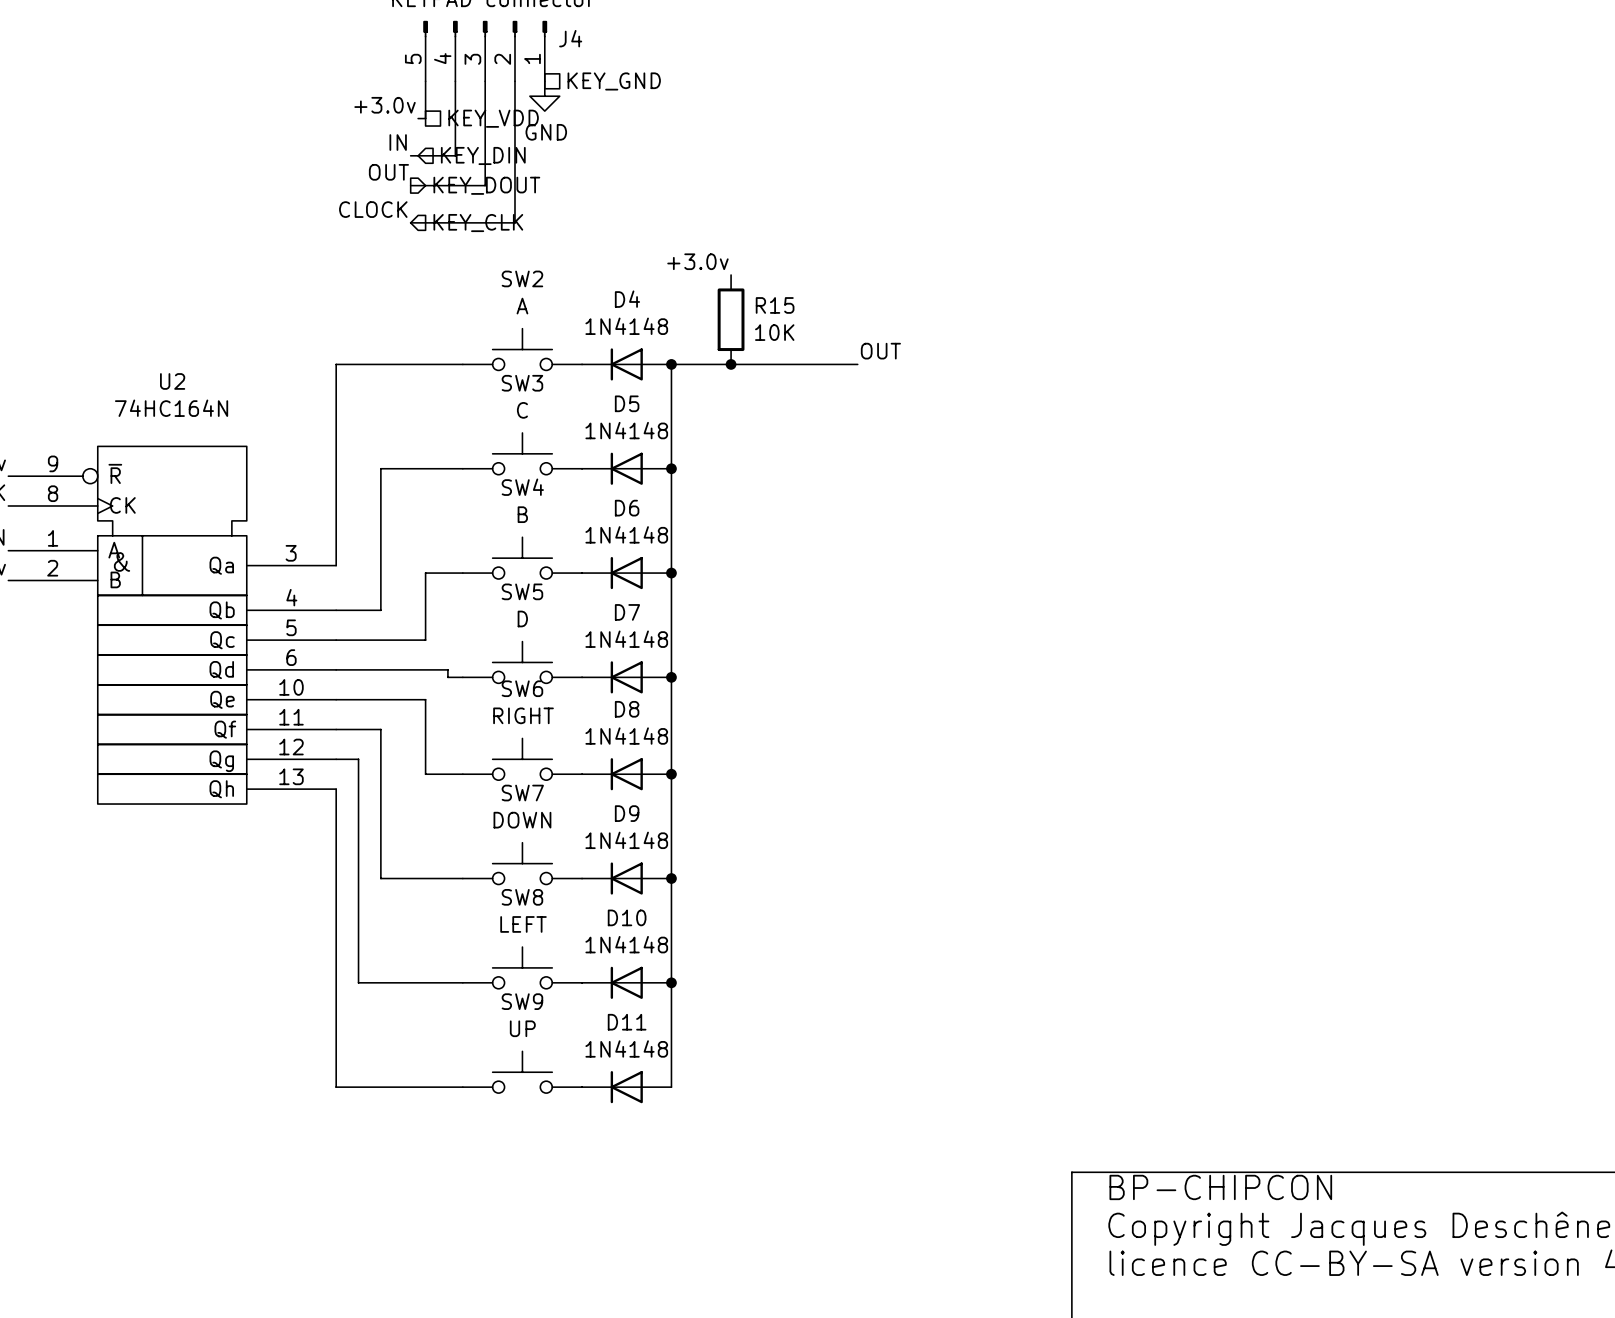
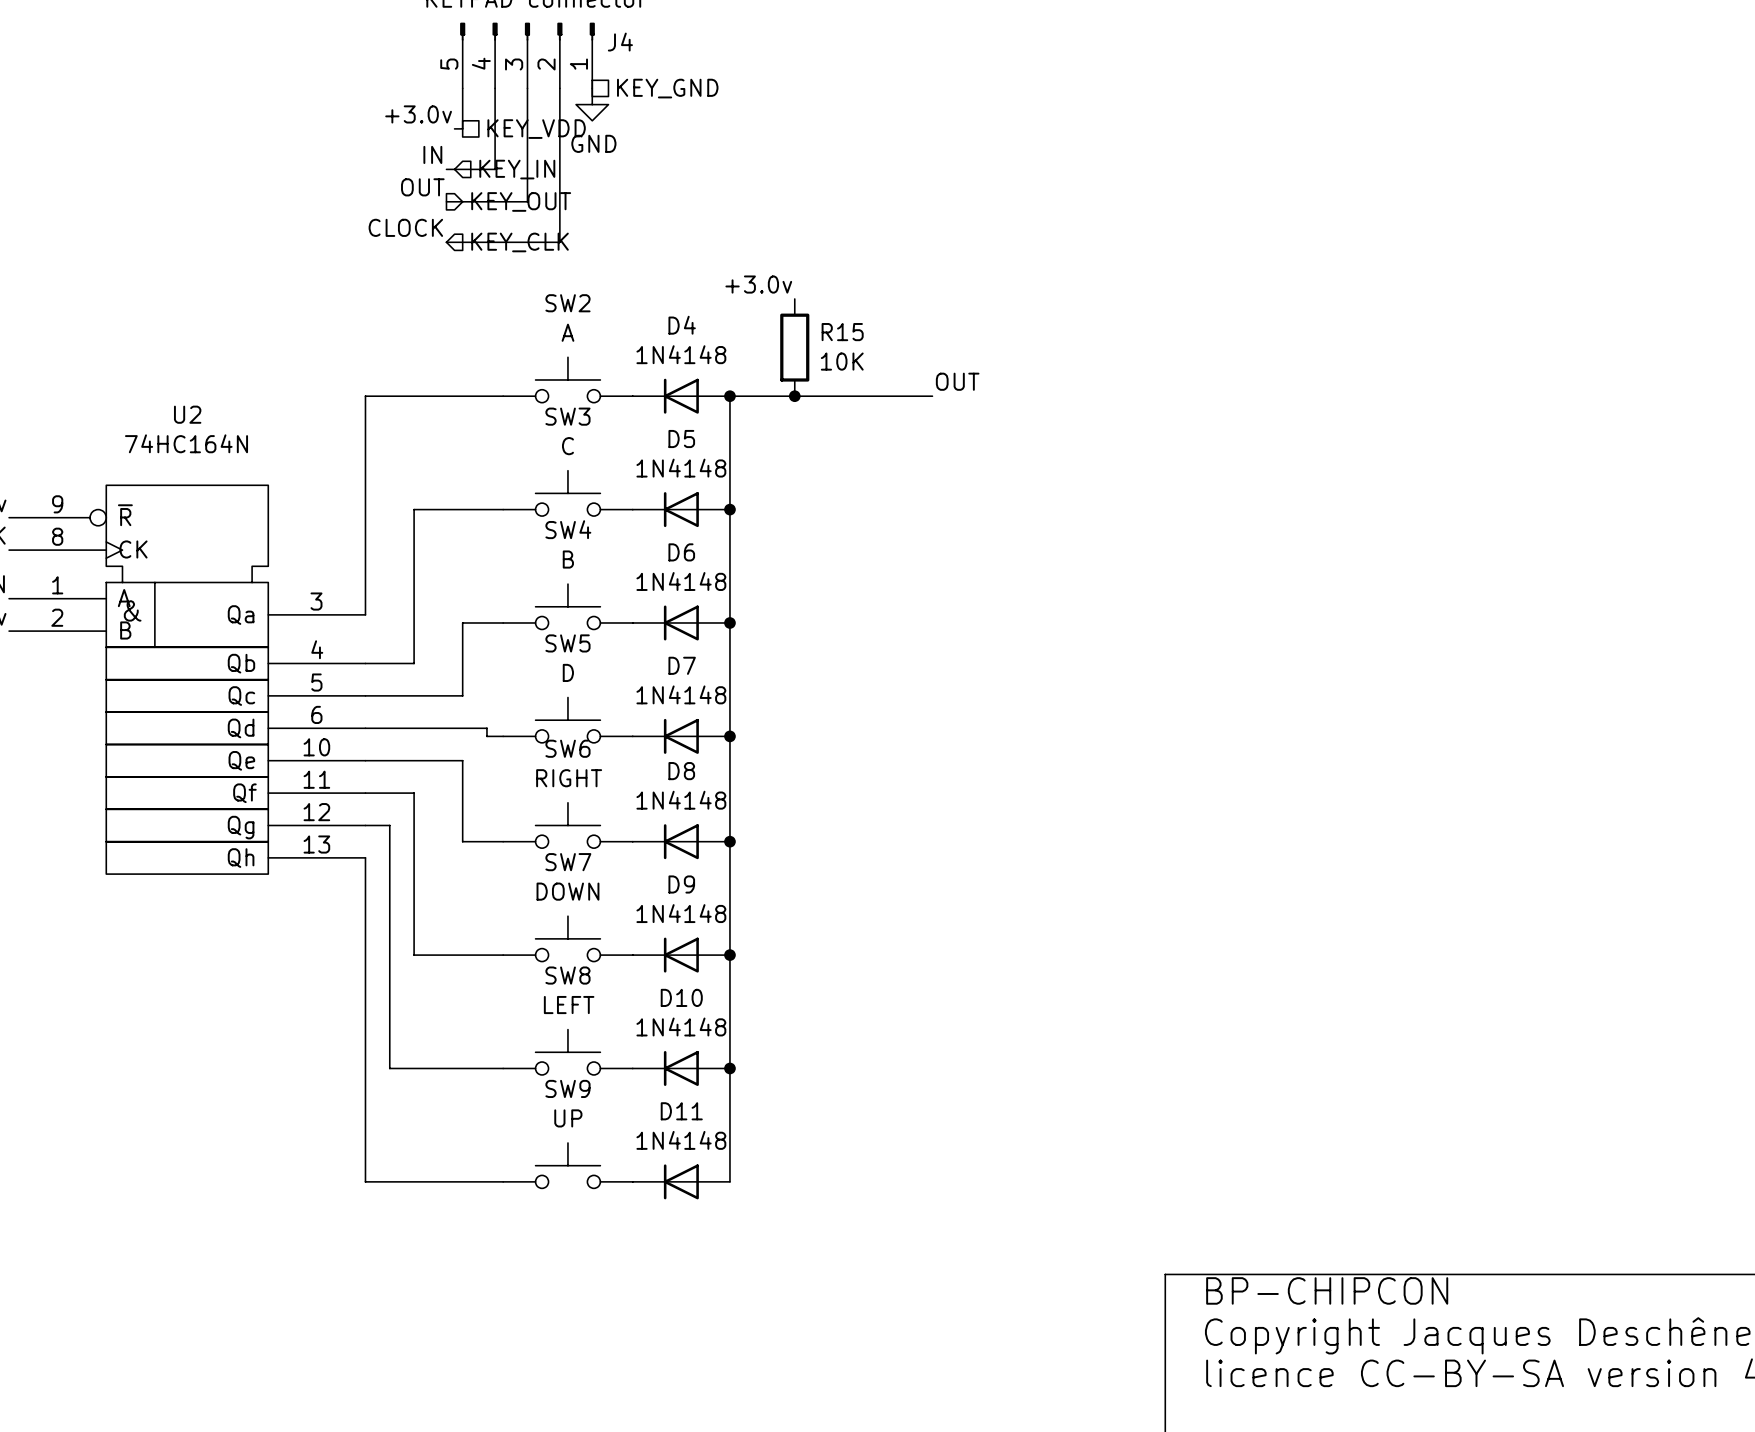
hierarchical label: KEY_DIN (483, 155) -> KEY_IN (517, 169)
hierarchical label: KEY_DOUT (486, 185) -> KEY_OUT (521, 201)

